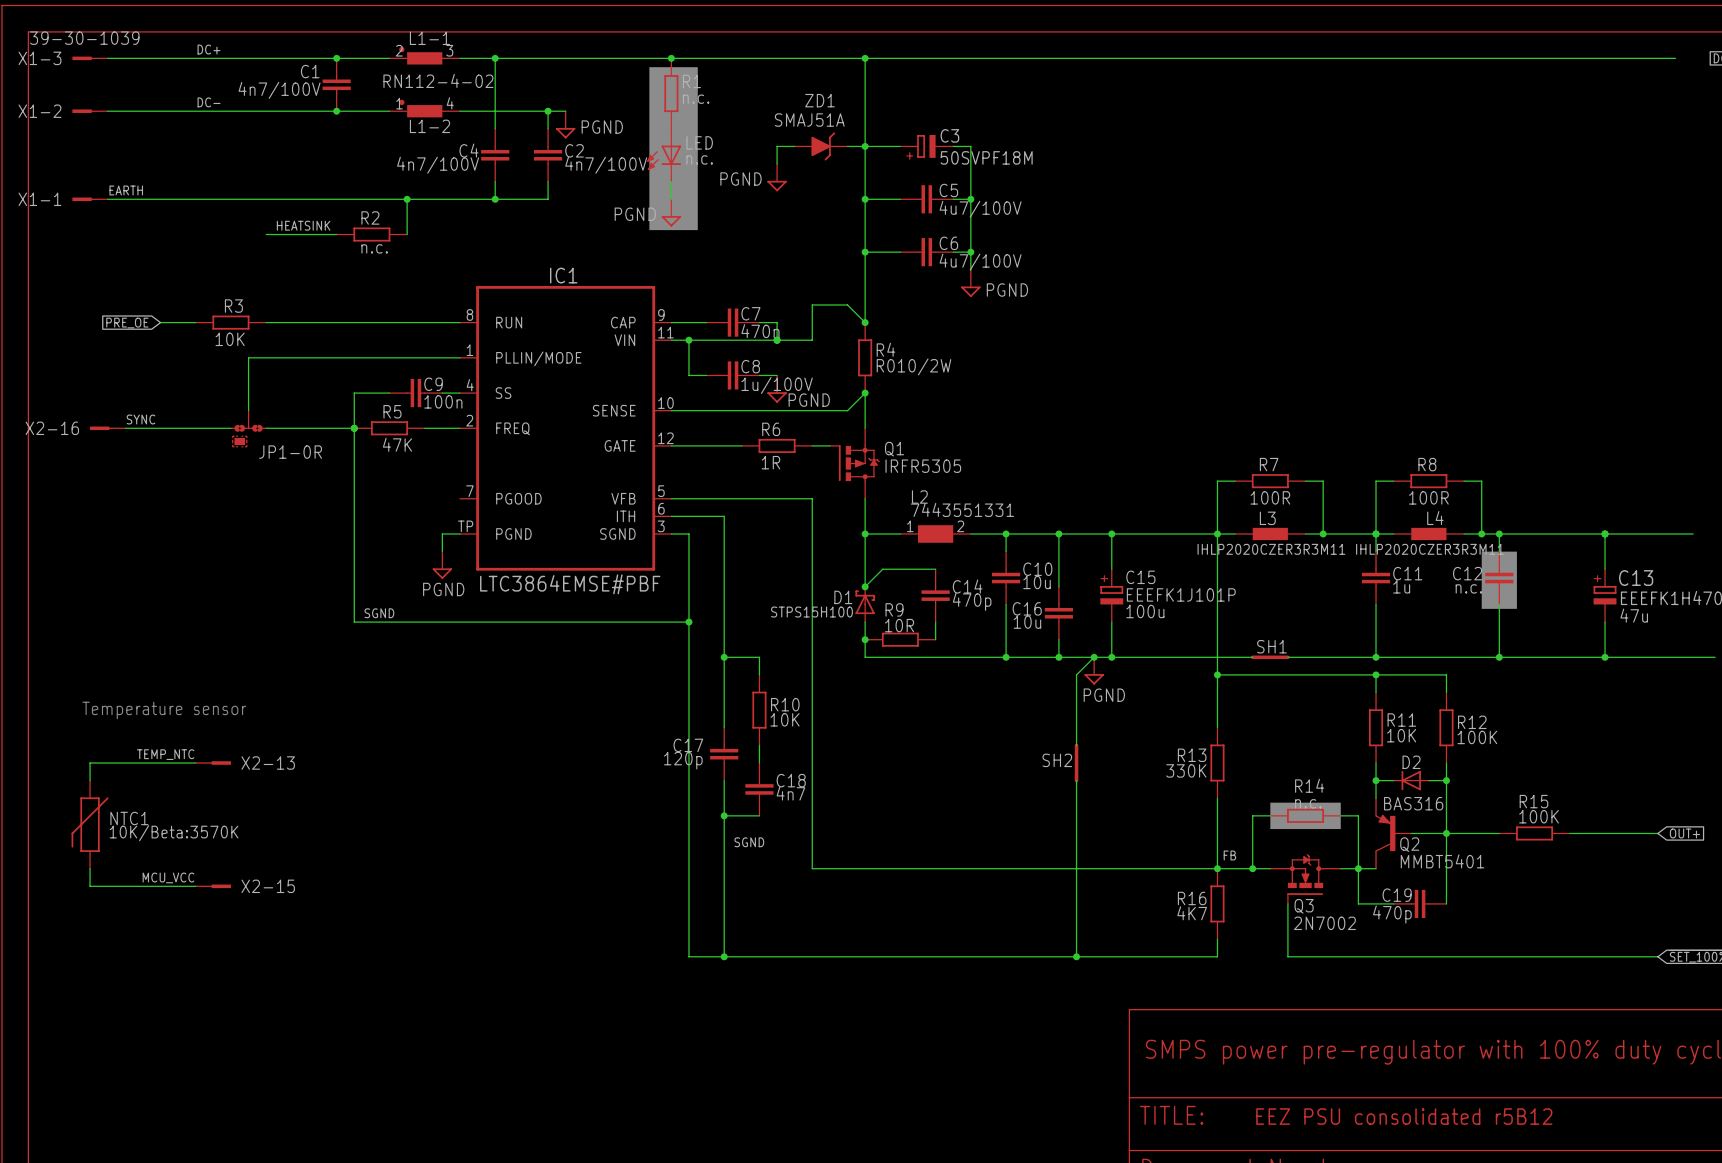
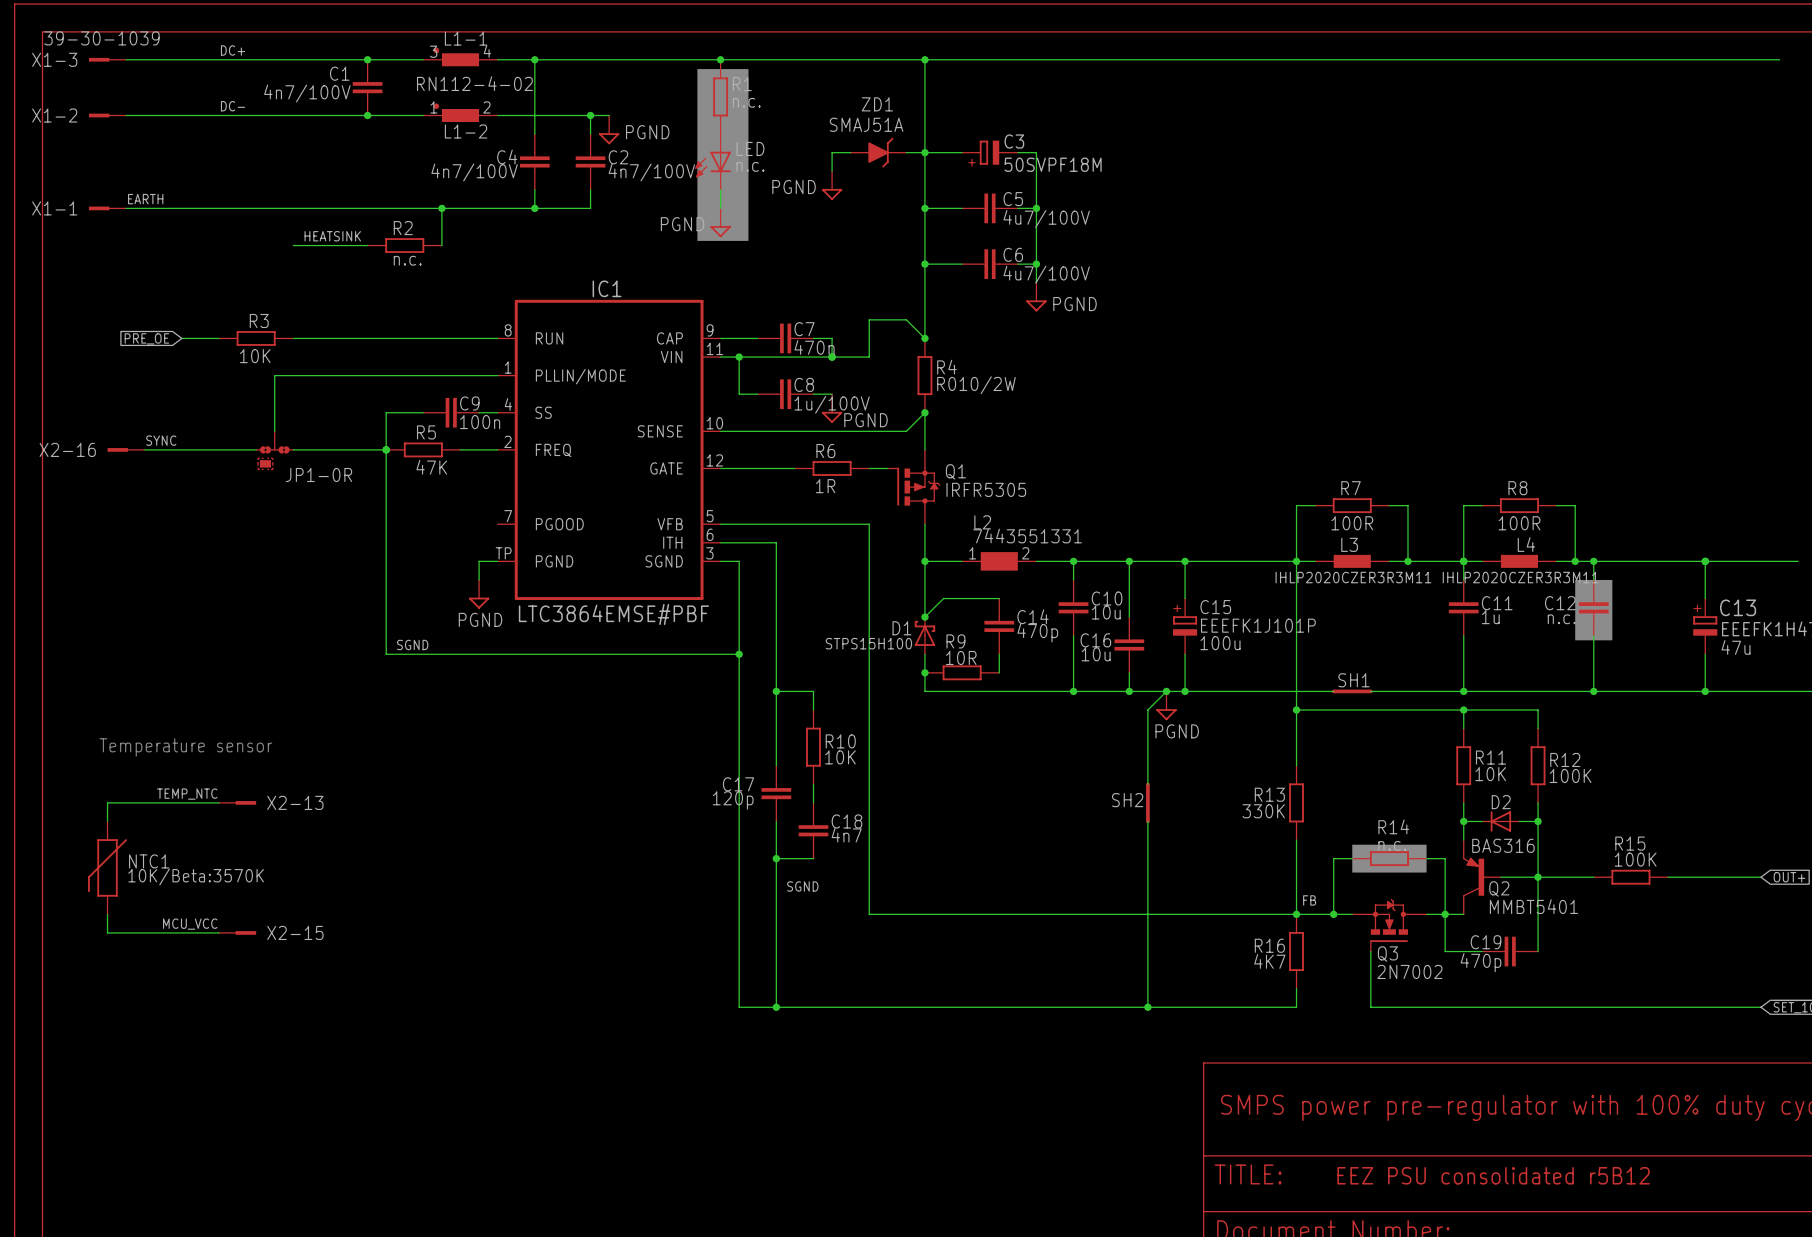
L1-1 pin number: 2 (399, 50) -> 3 (433, 51)
L1-1 pin number: 3 (449, 50) -> 4 (487, 51)
L1-2 pin number: 4 (450, 103) -> 2 (486, 107)

